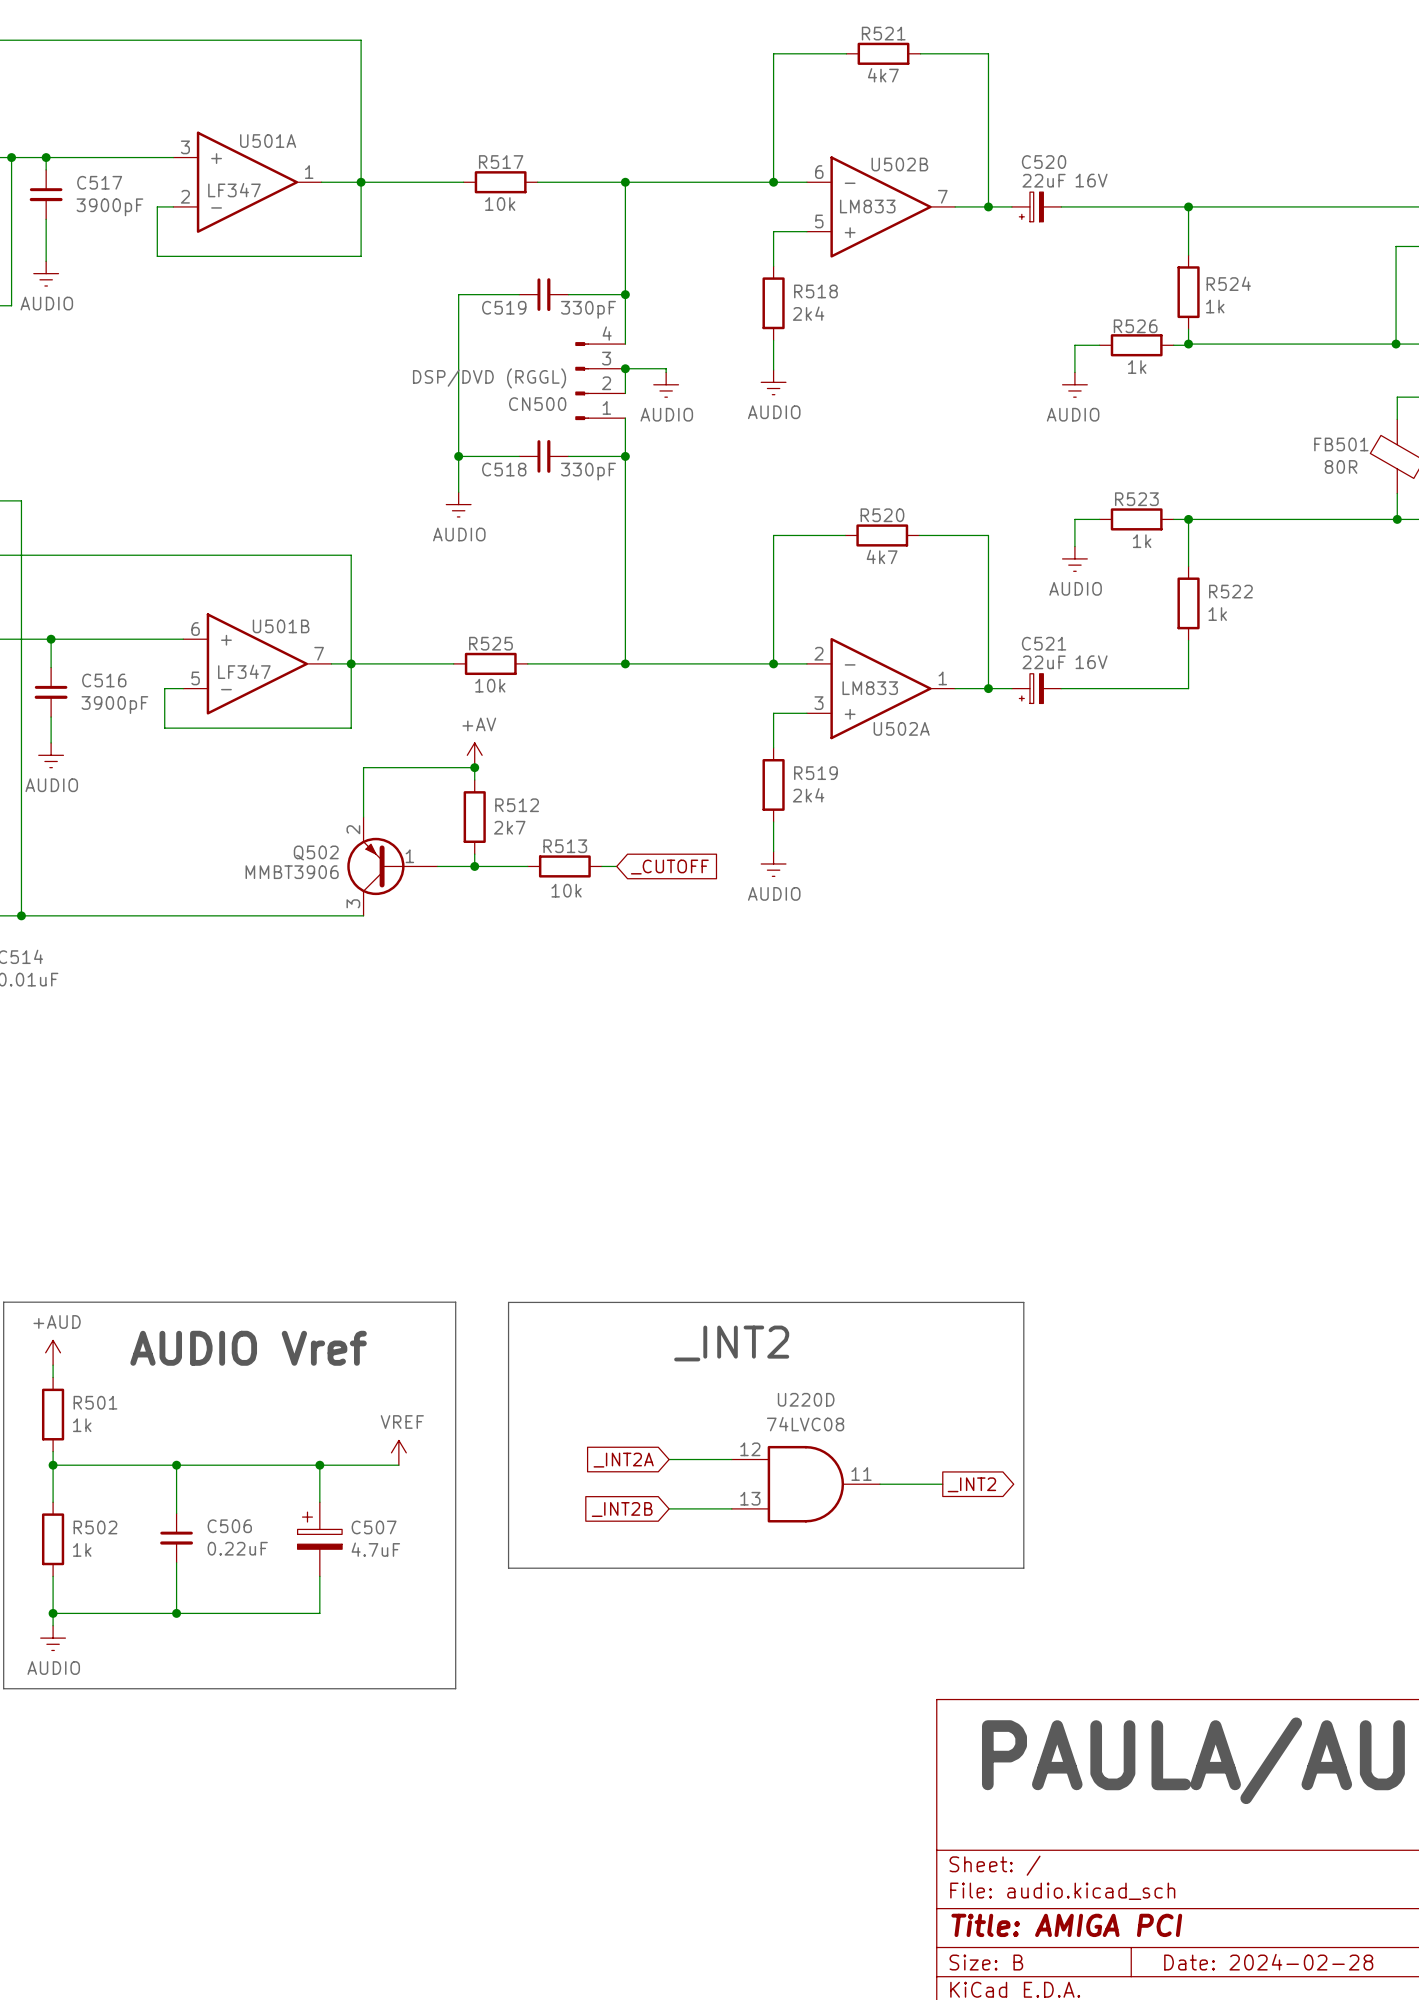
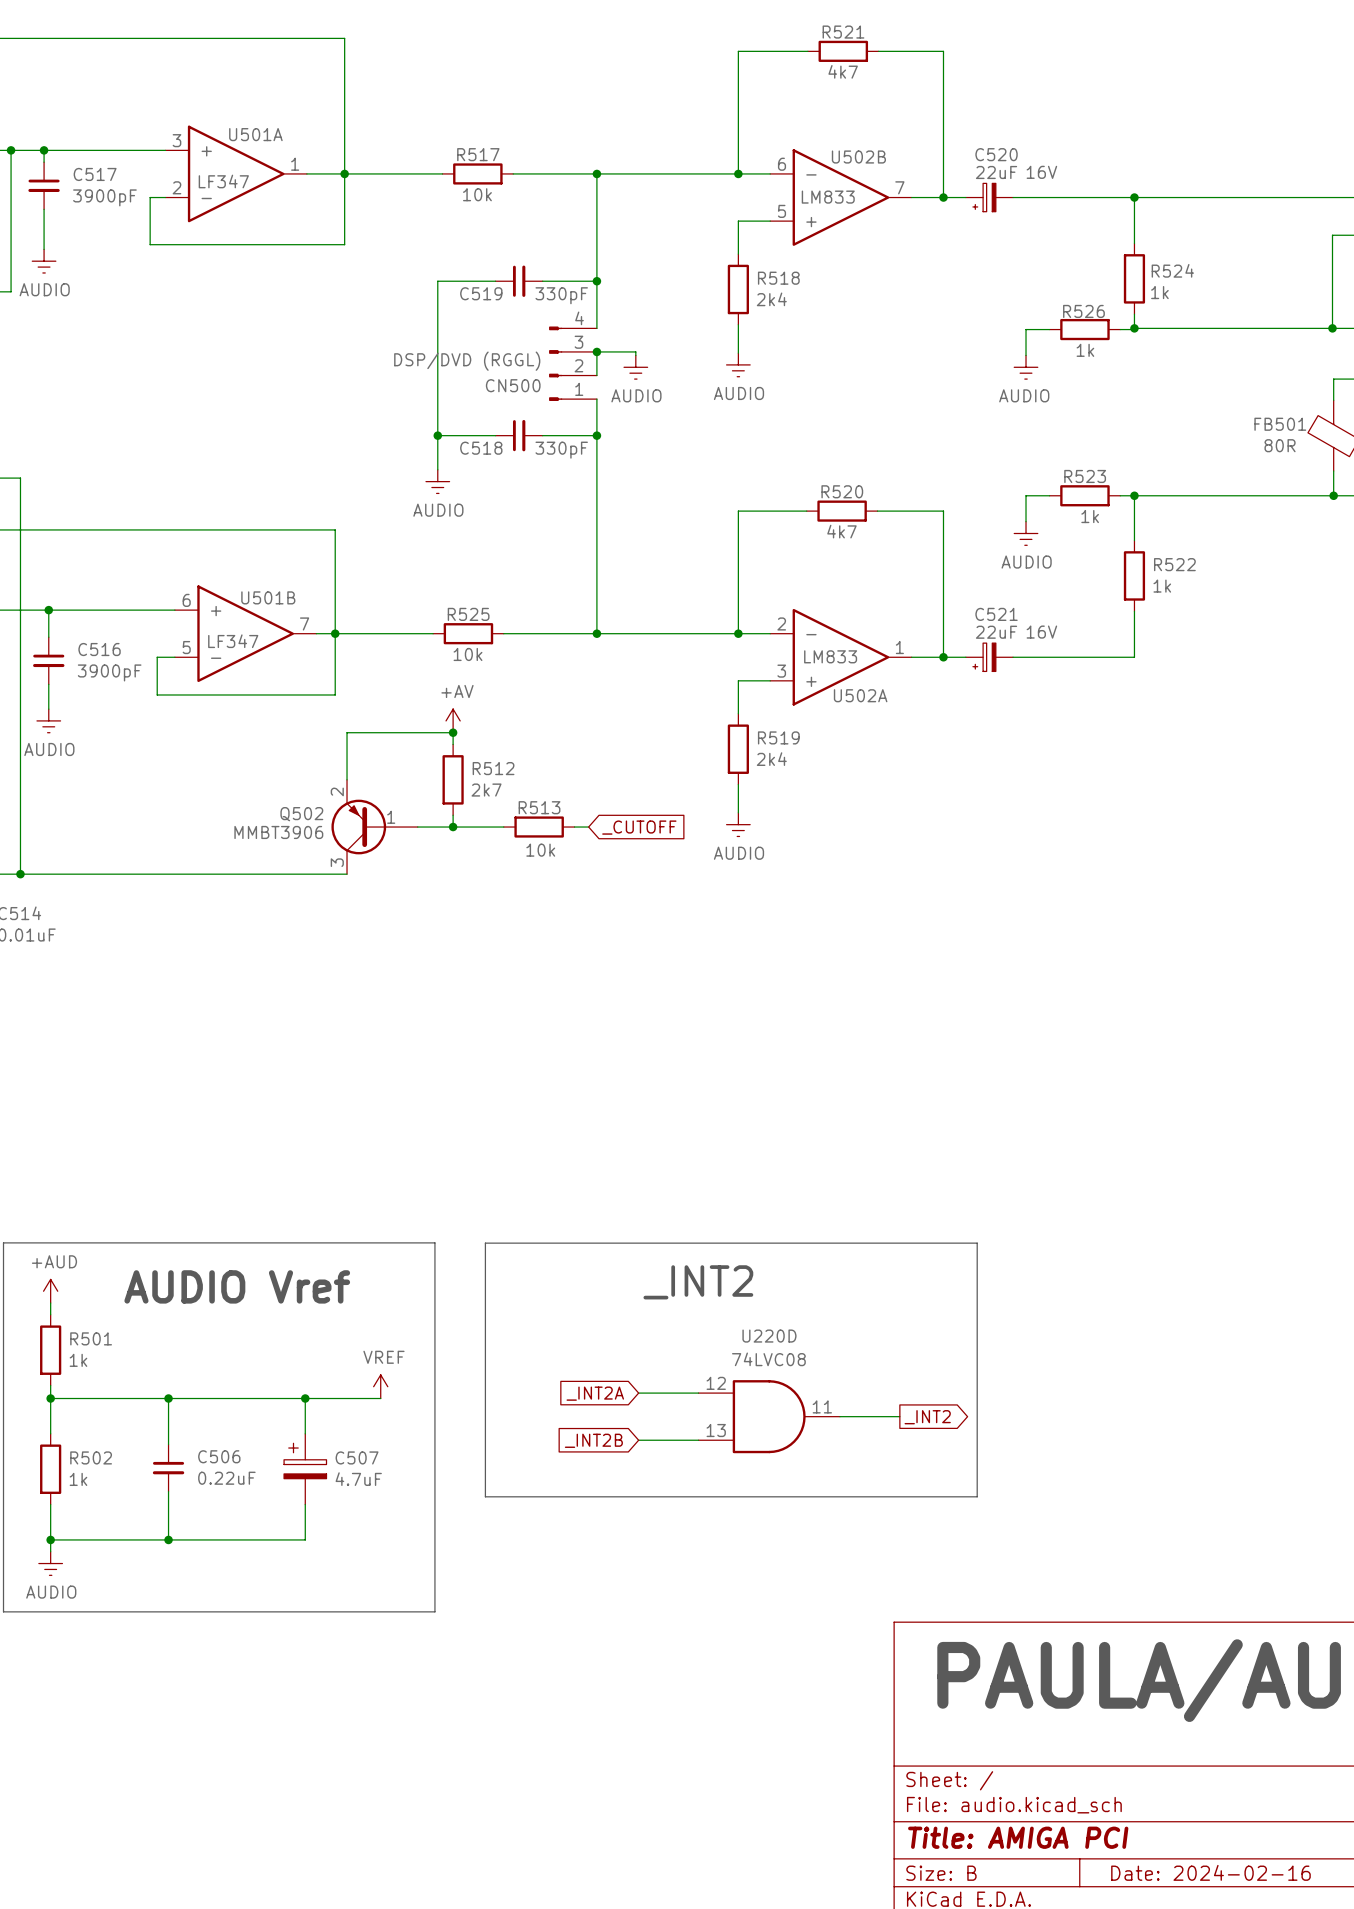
title block: Date: 2024-02-28 (1268, 1962) -> Date: 2024-02-16 (1210, 1872)

